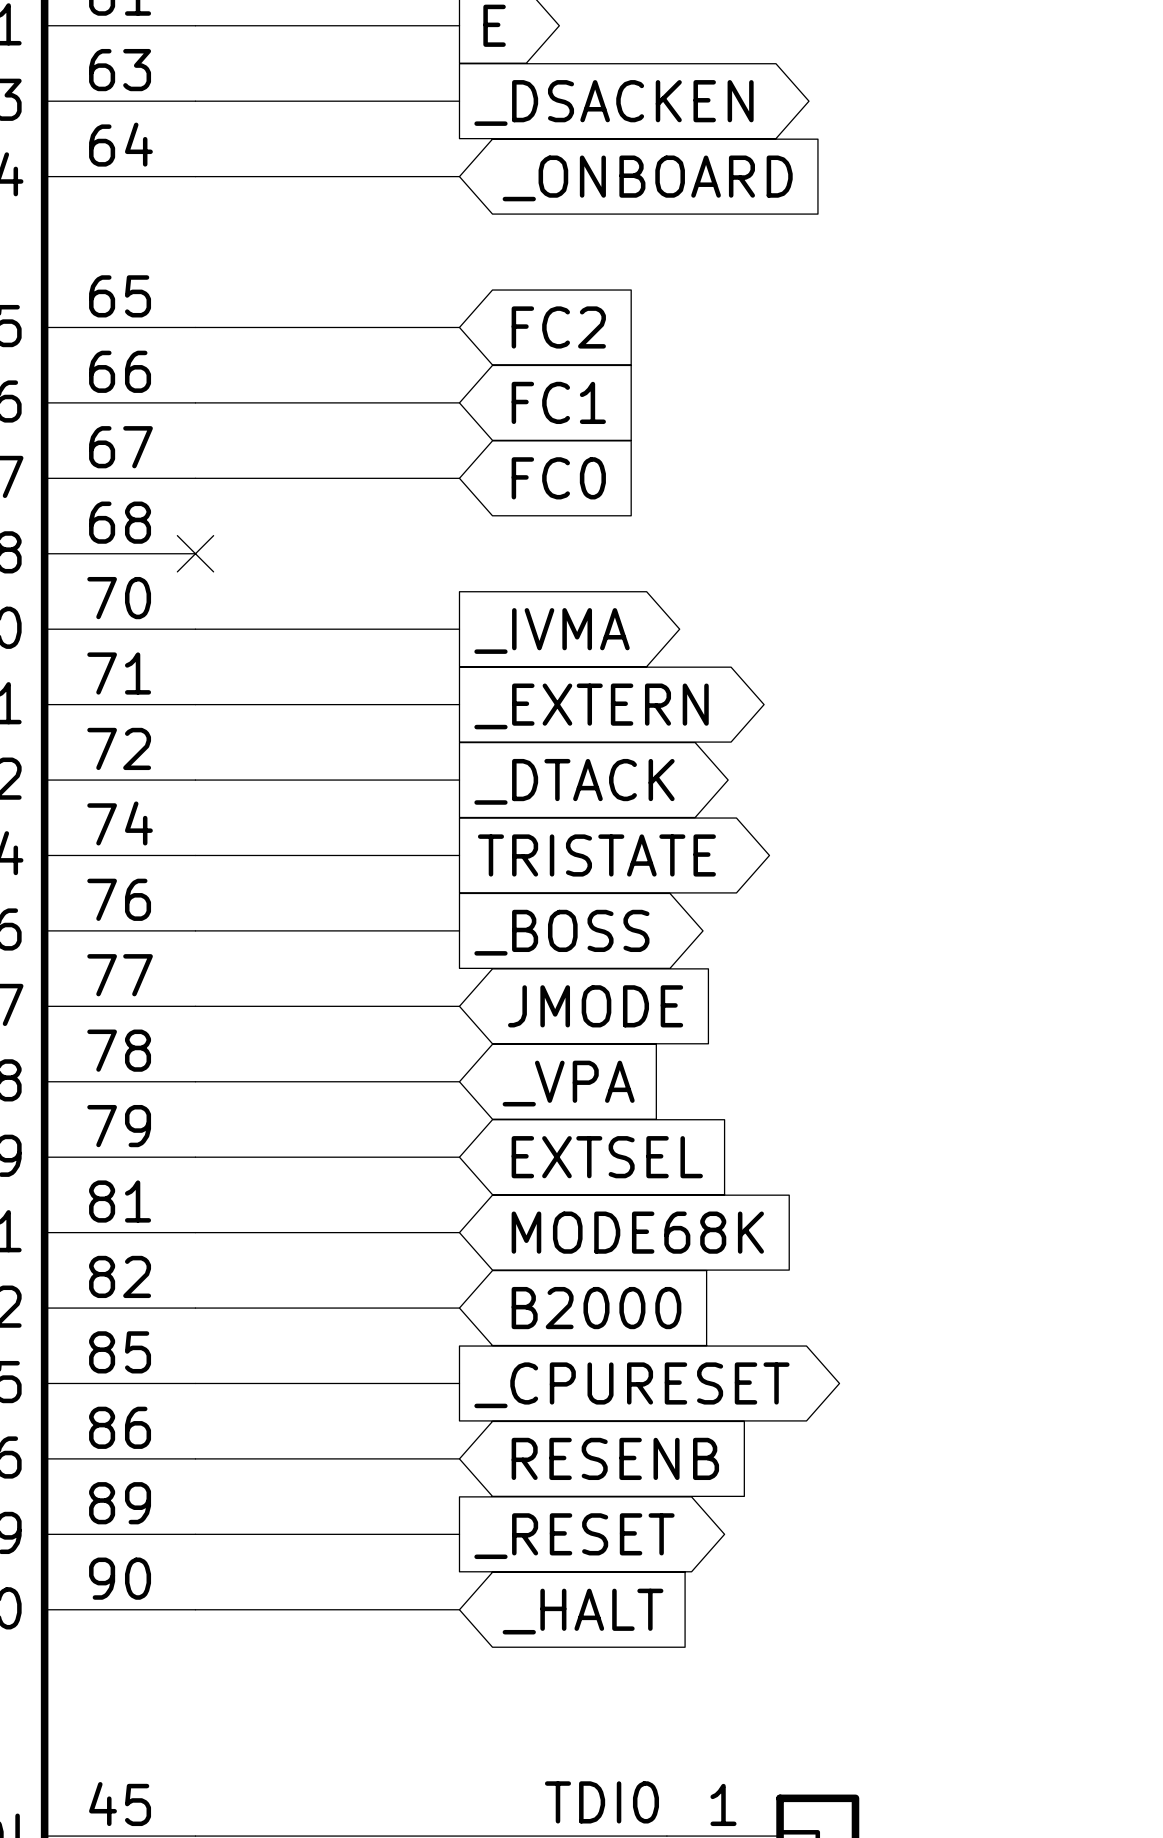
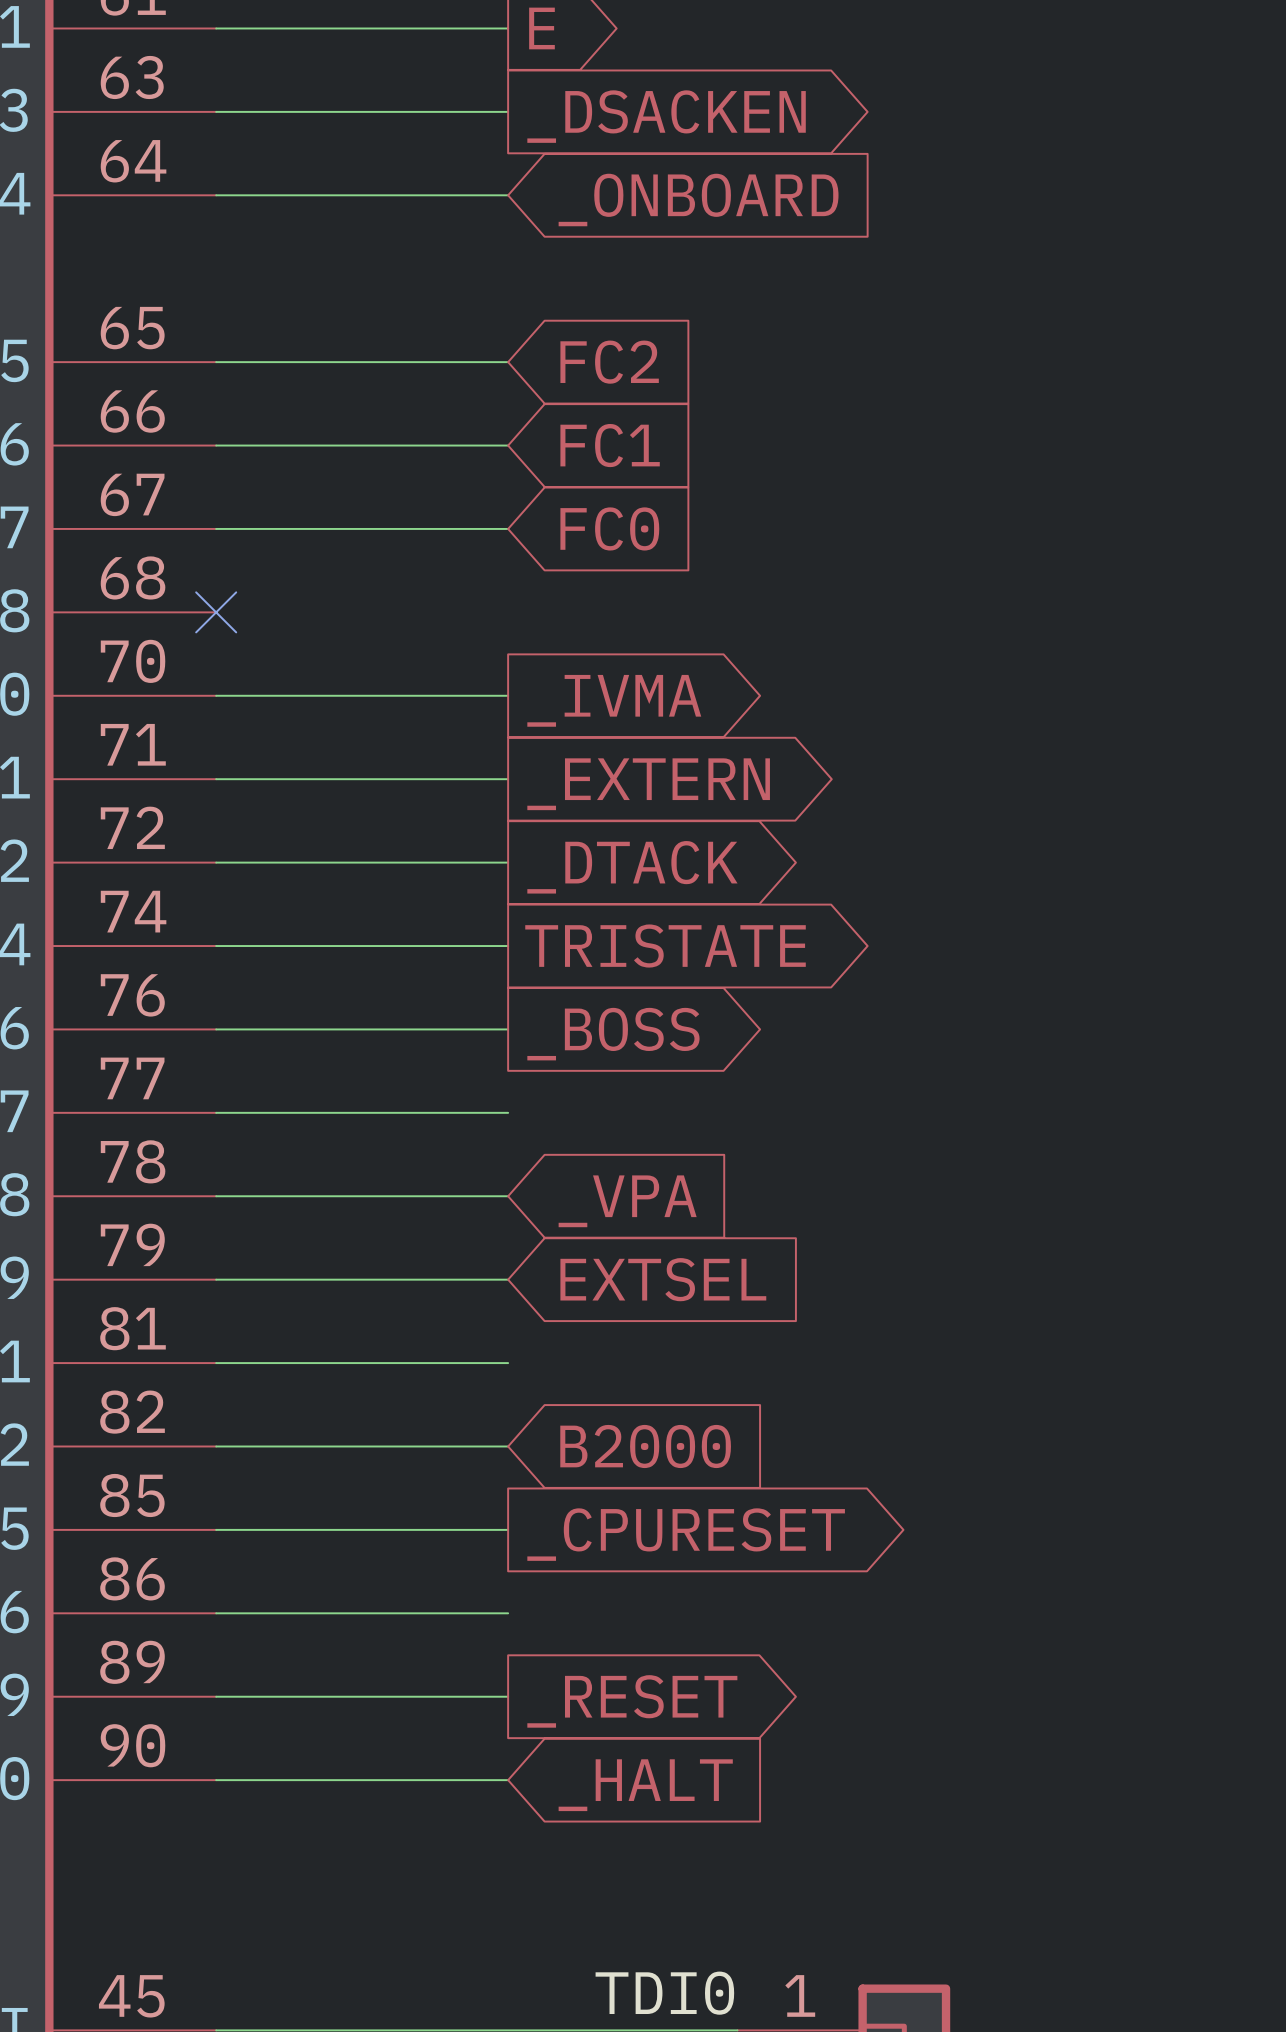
global label: JMODE (595, 1006) -> none
global label: MODE68K (637, 1232) -> none
global label: RESENB (615, 1458) -> none

